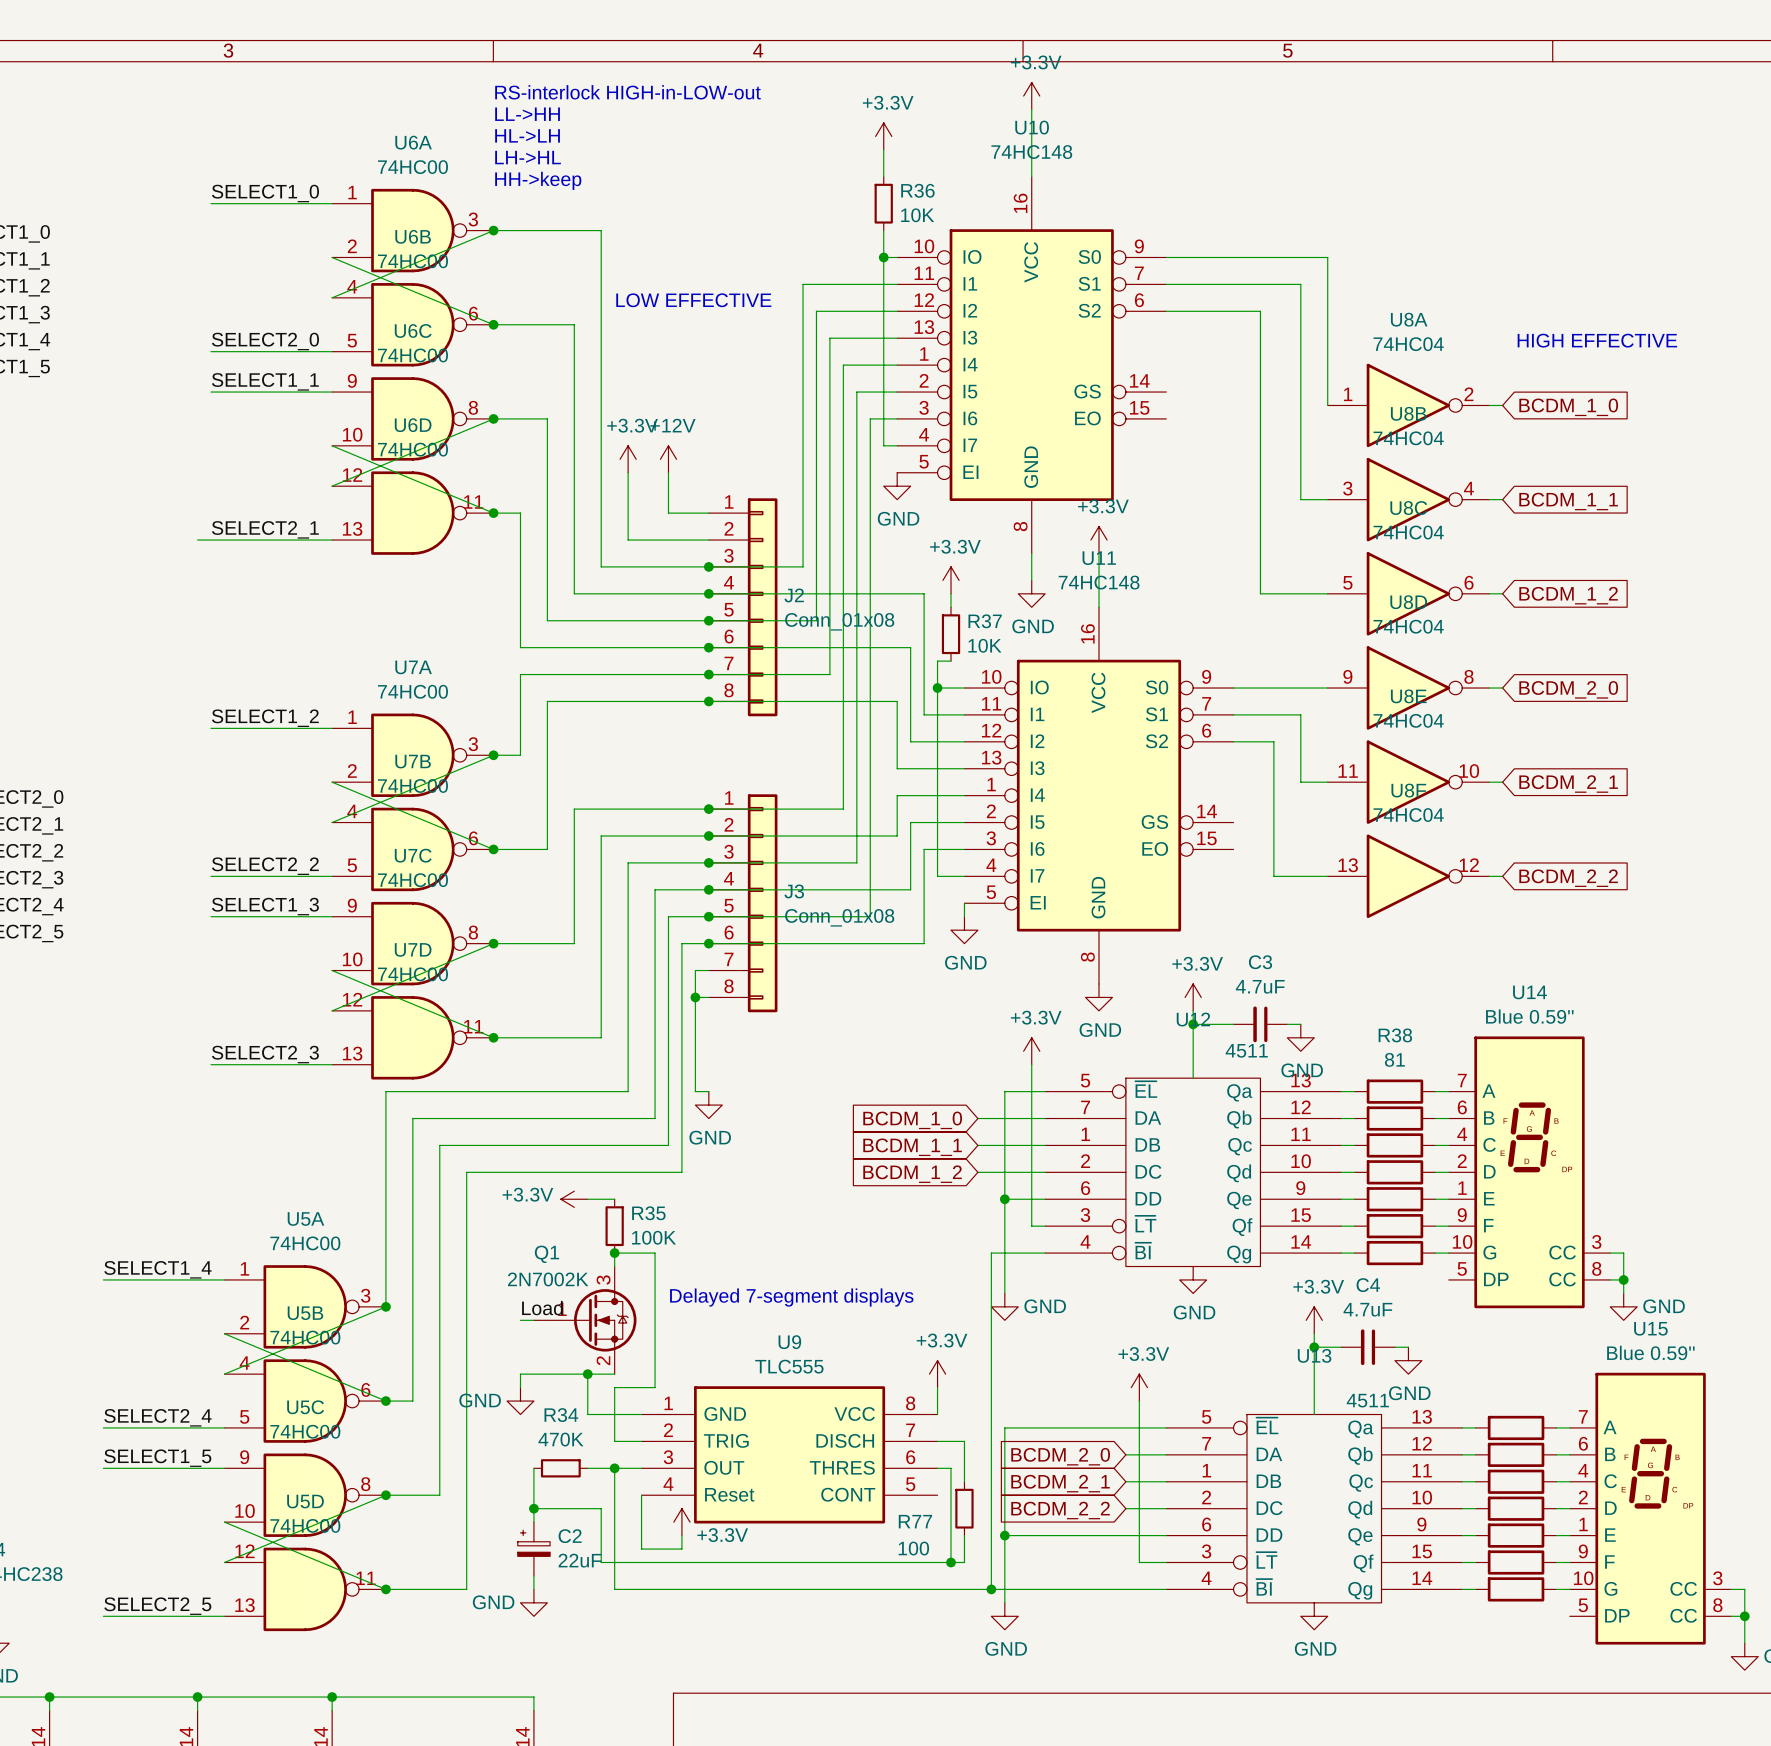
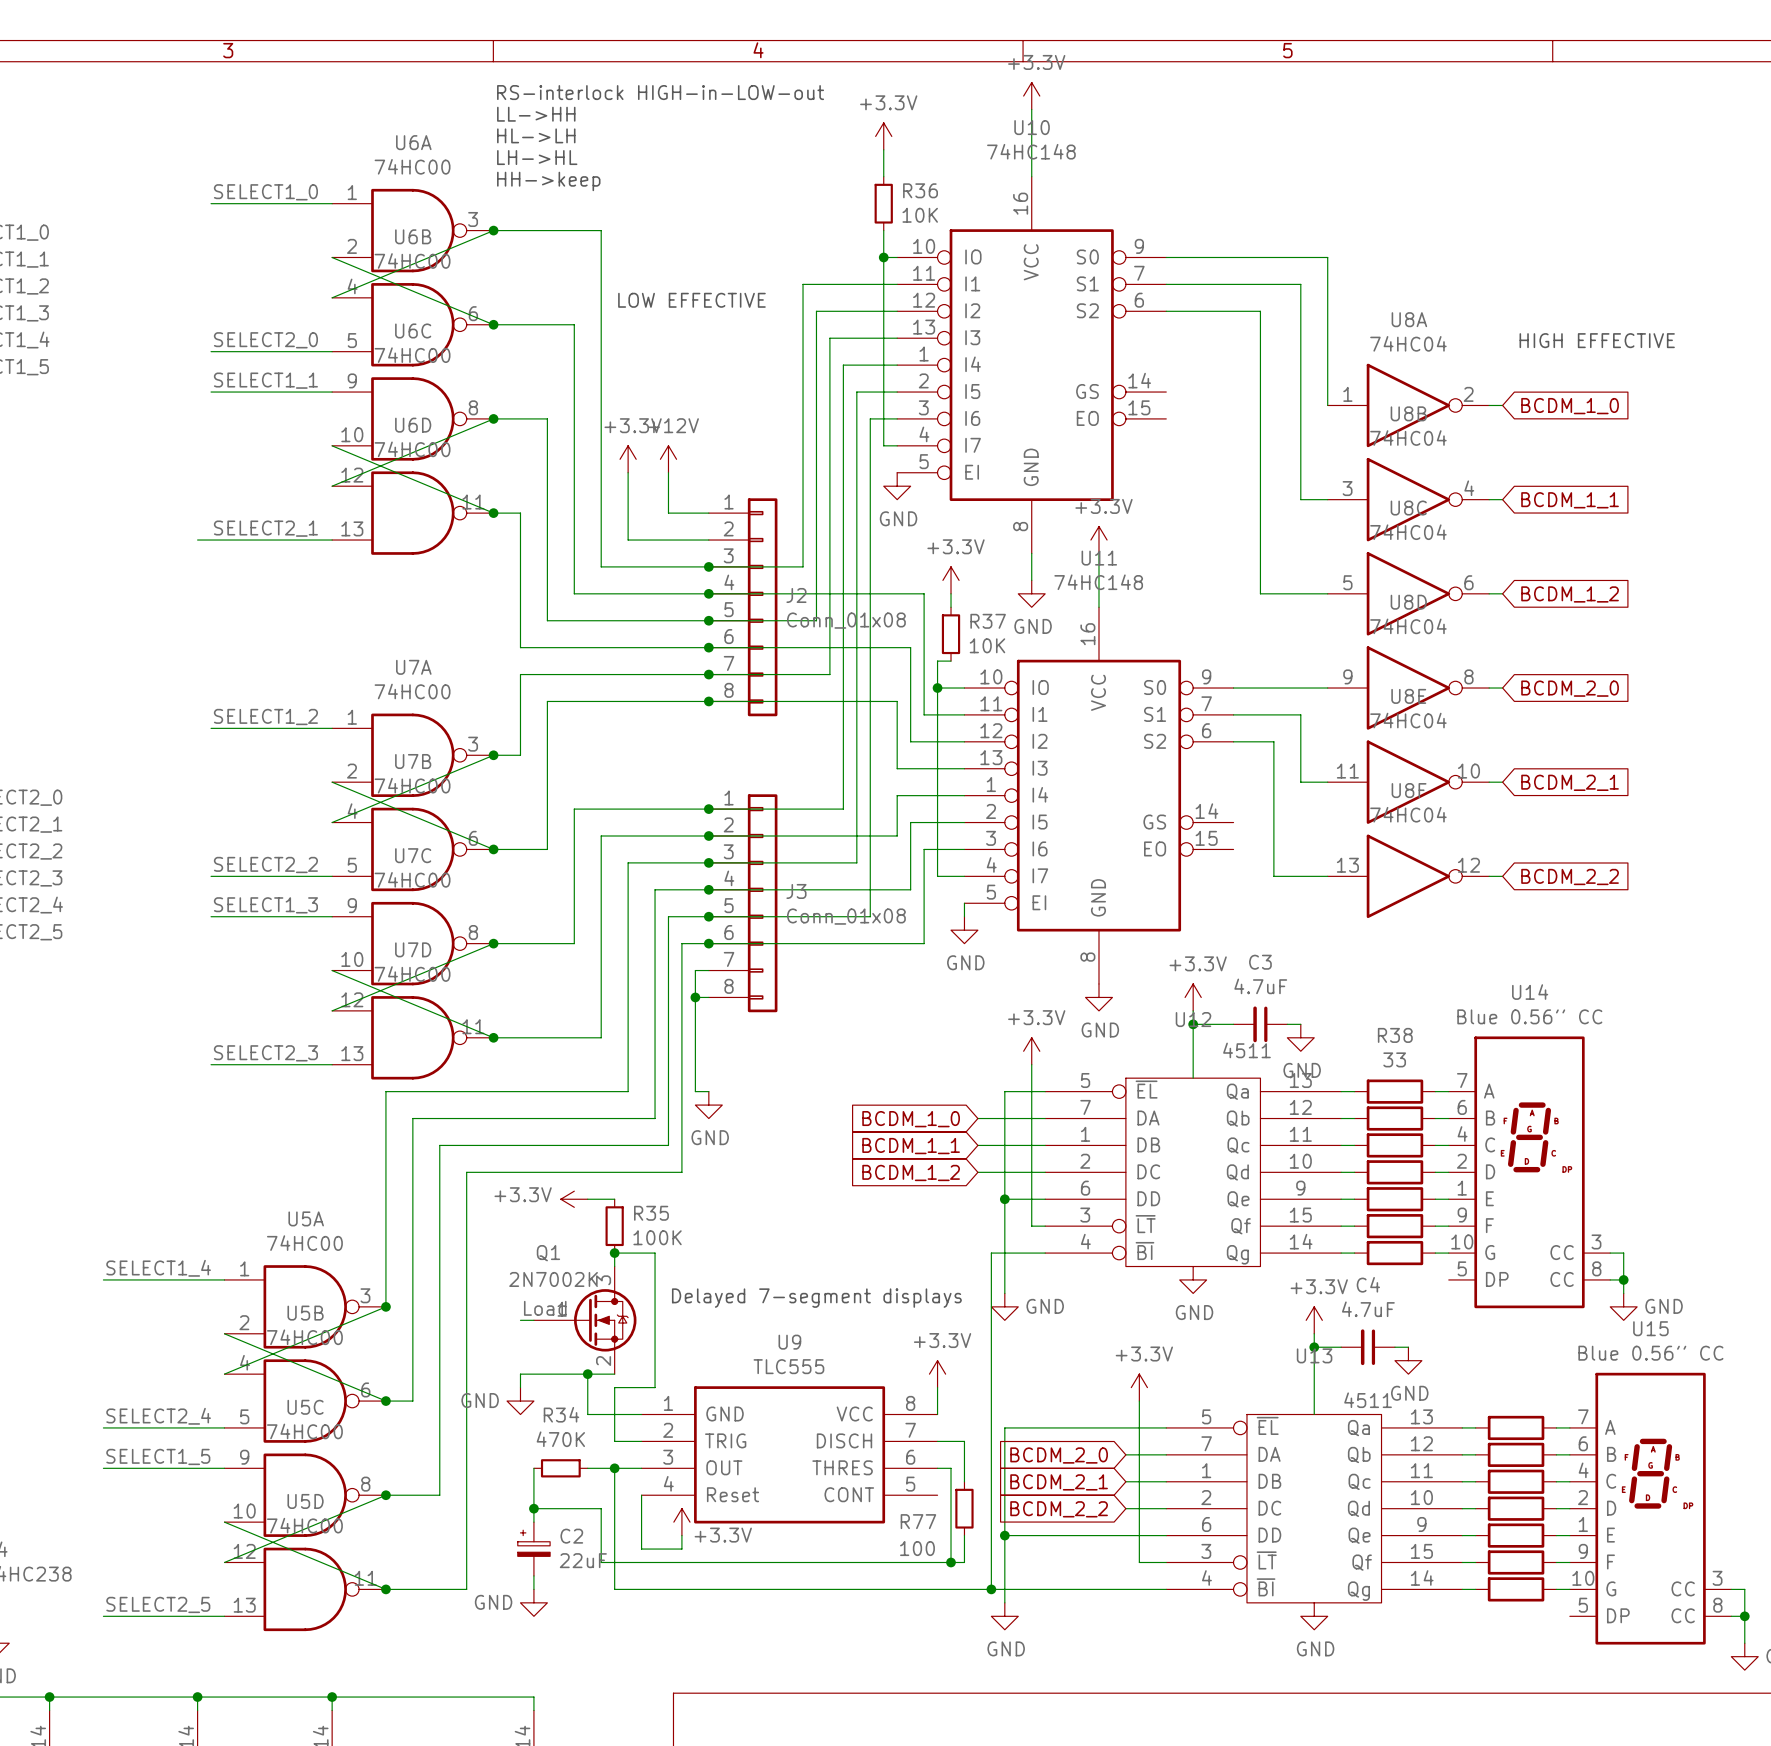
U14 value: Blue 0.59'' (1529, 1016) -> Blue 0.56'' CC (1529, 1016)
R38 value: 81 (1394, 1059) -> 33 (1394, 1059)
U15 value: Blue 0.59'' (1650, 1352) -> Blue 0.56'' CC (1650, 1353)

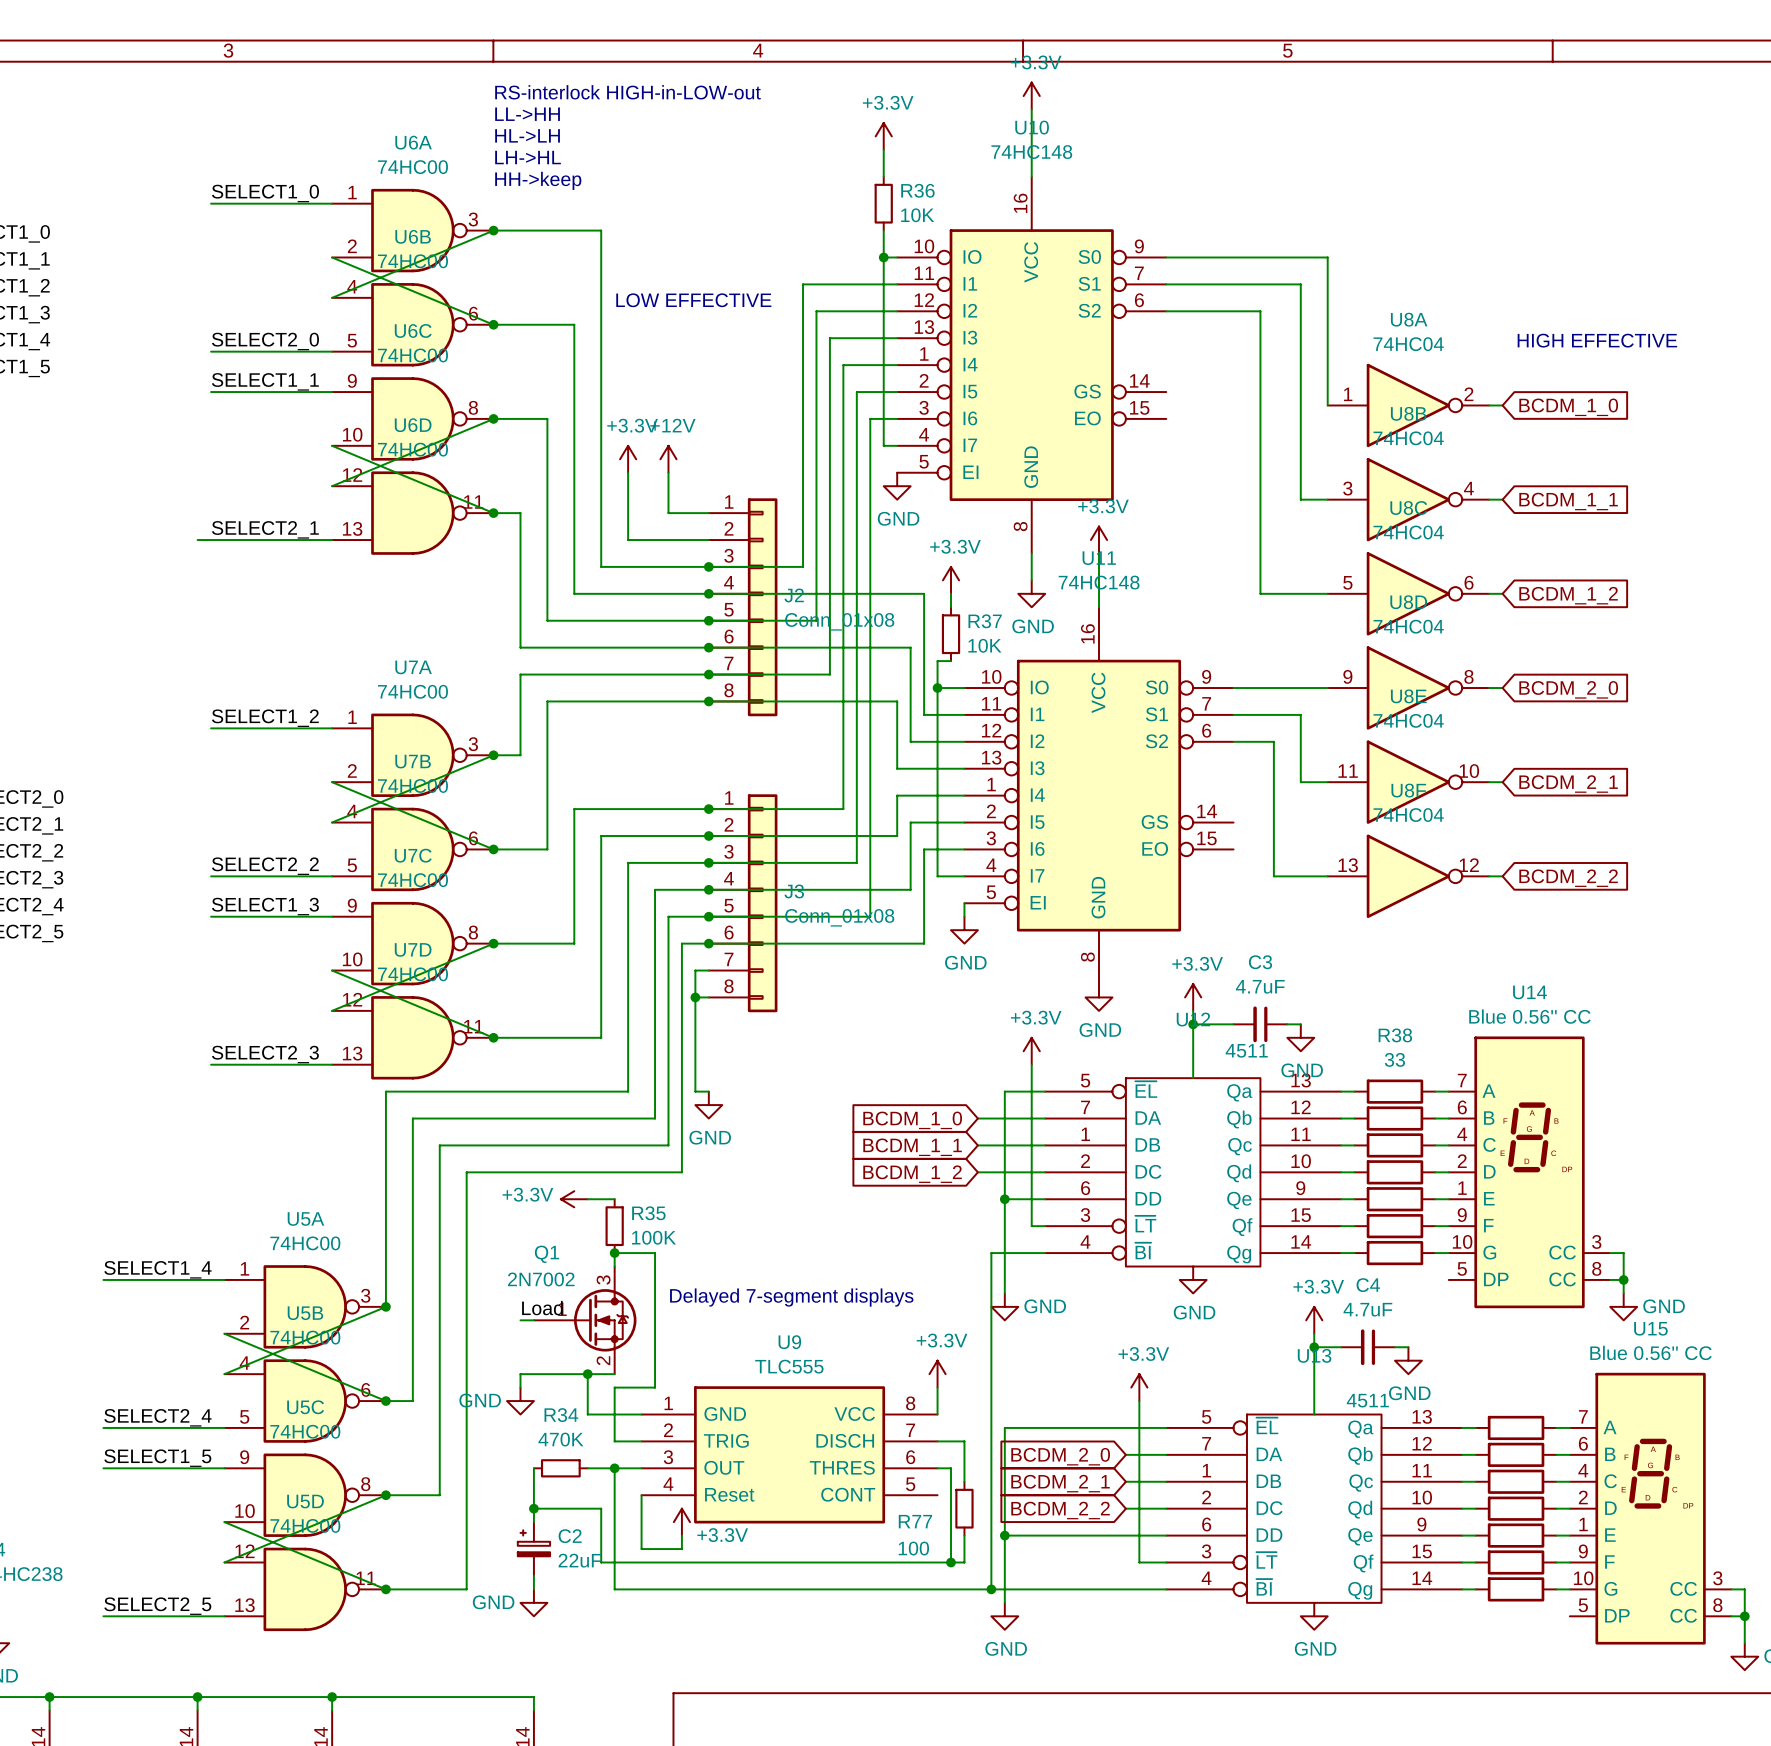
Q1 value: 2N7002K (553, 1279) -> 2N7002 (541, 1279)

